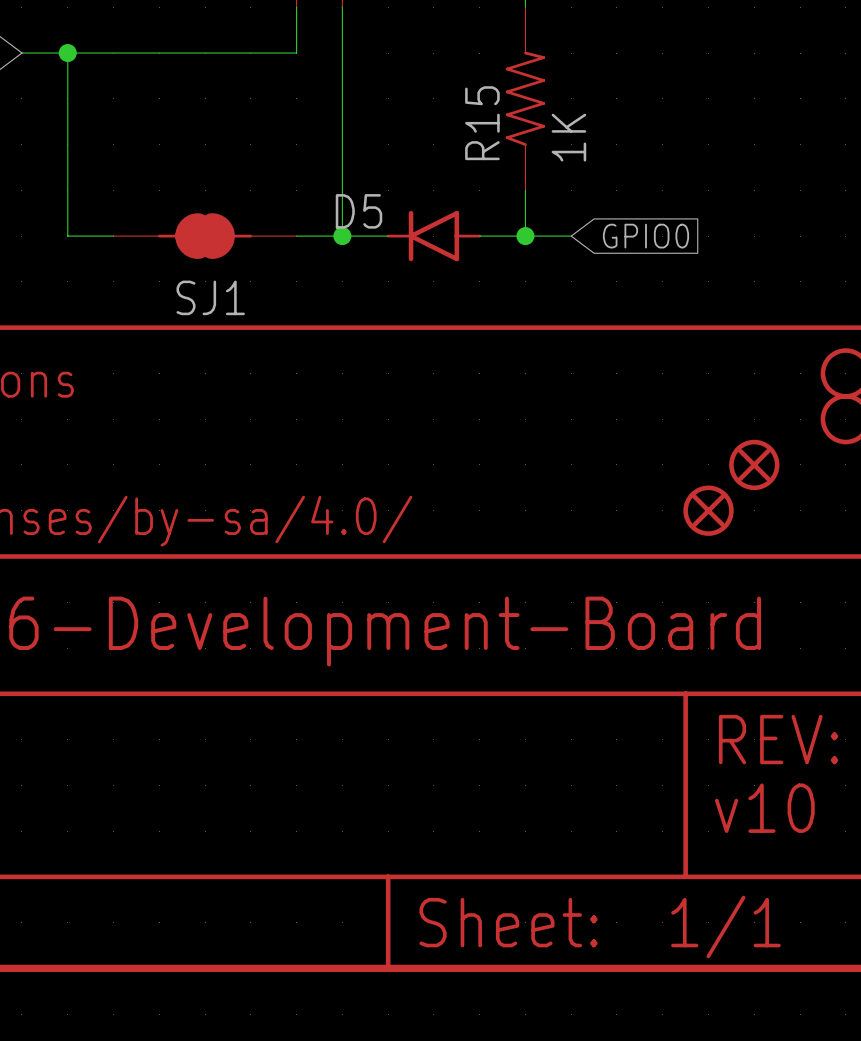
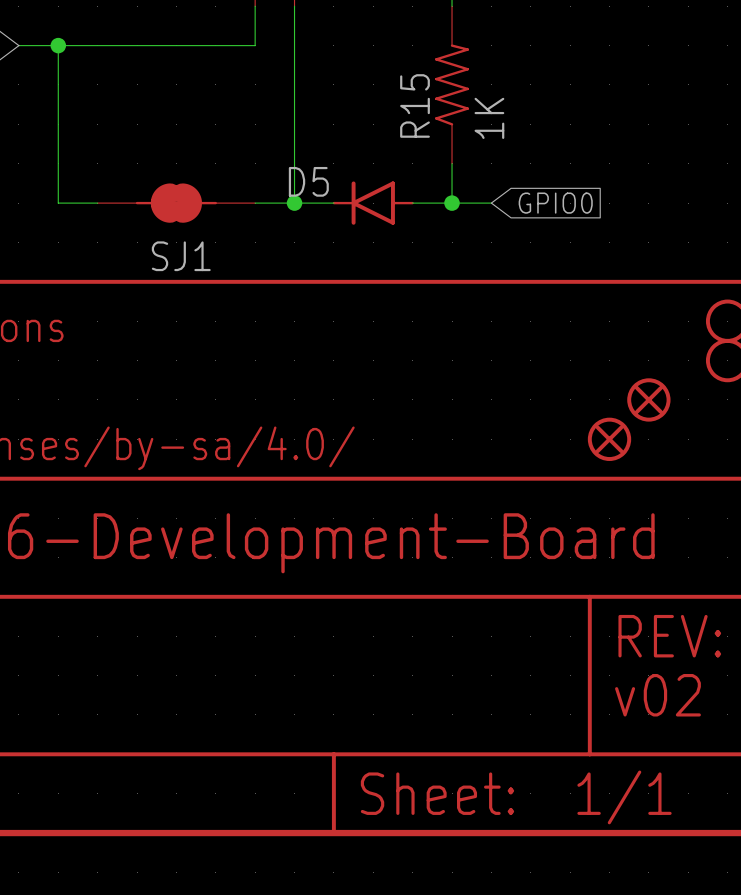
text: v10 (764, 808) -> v02 (657, 695)

